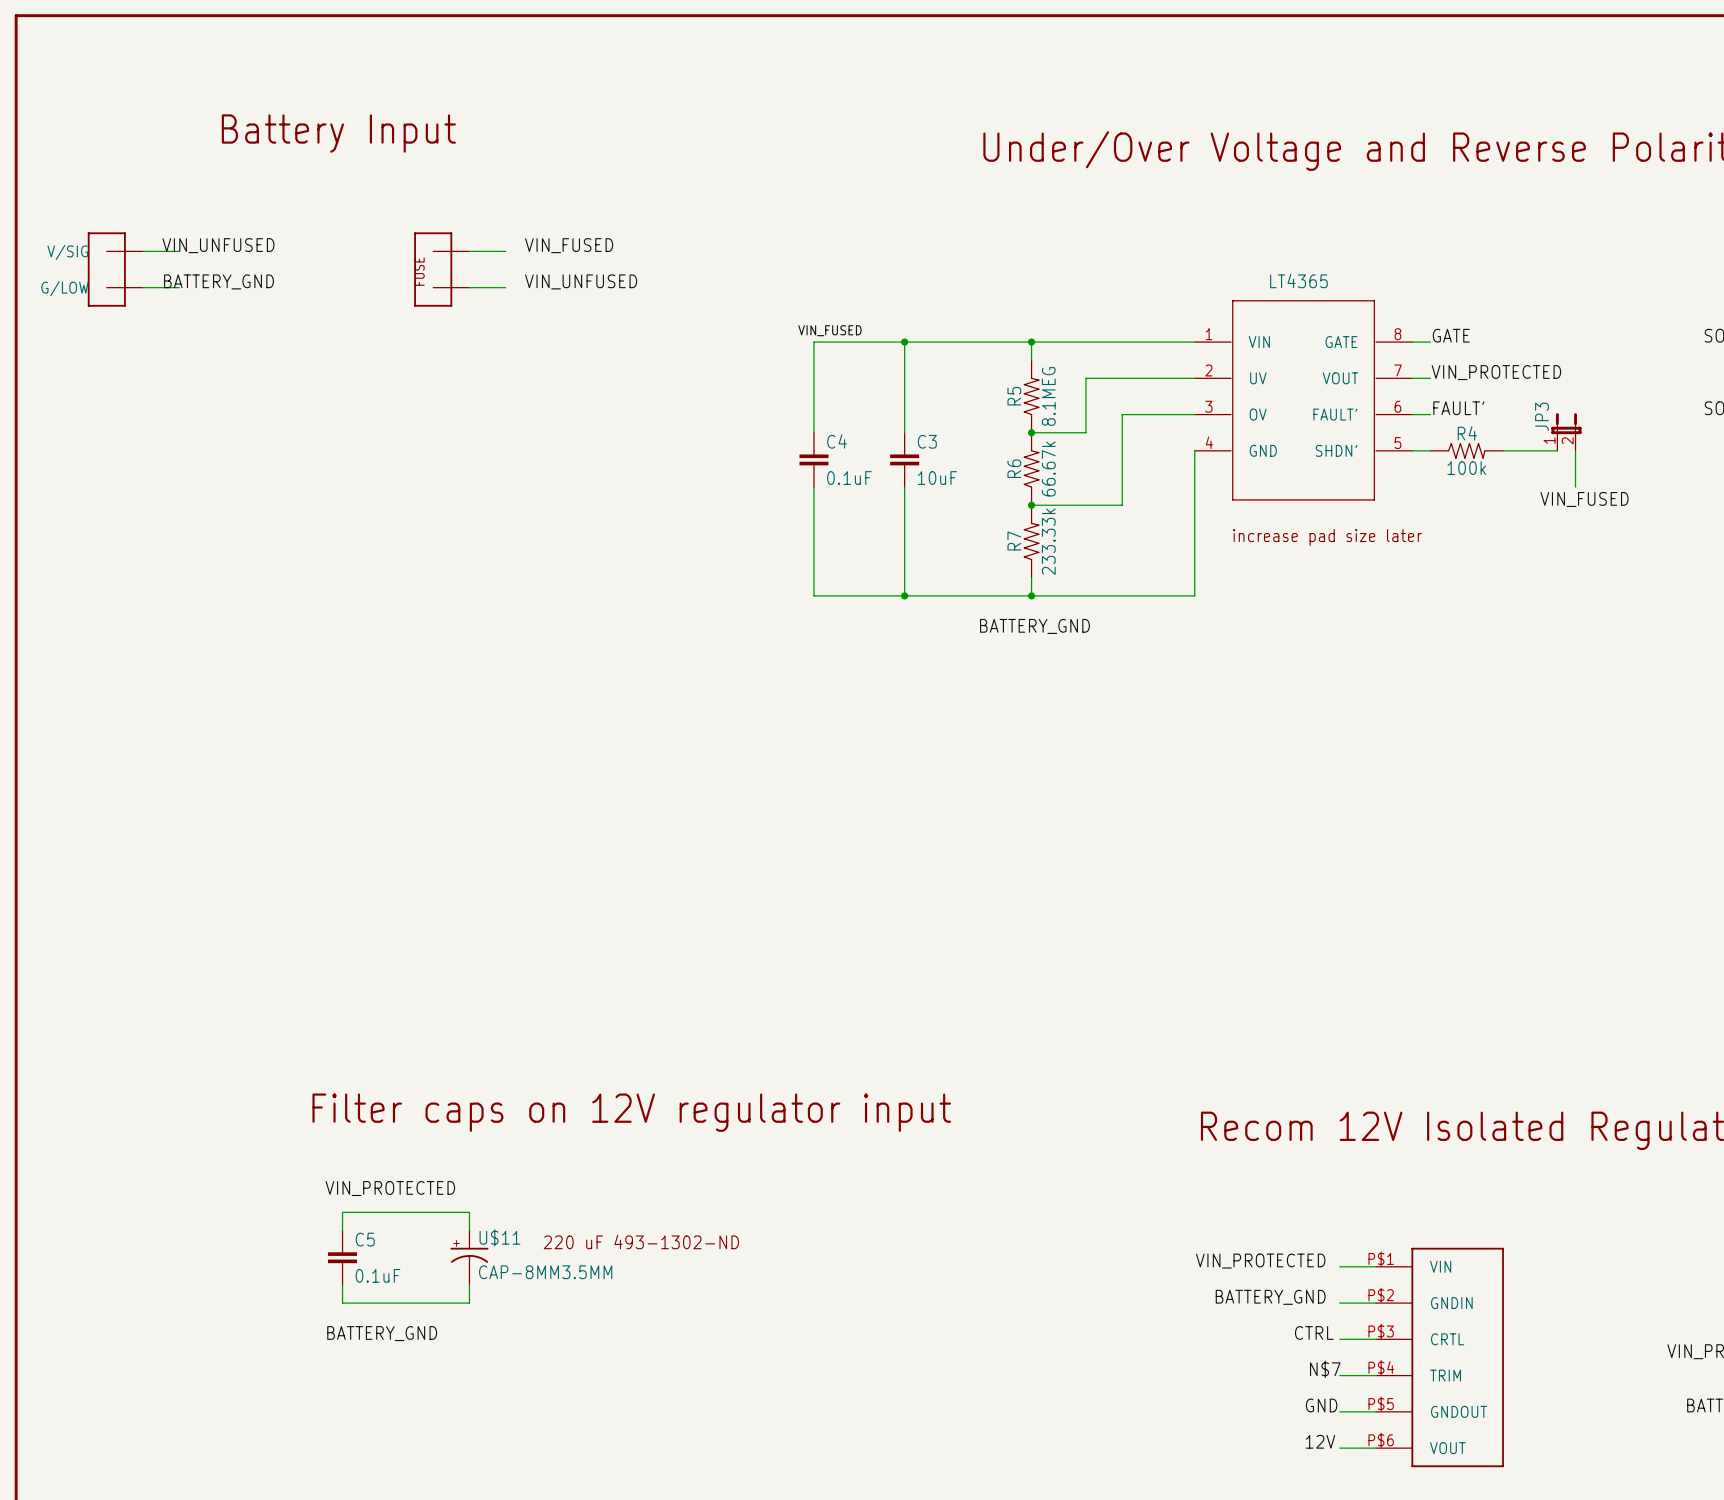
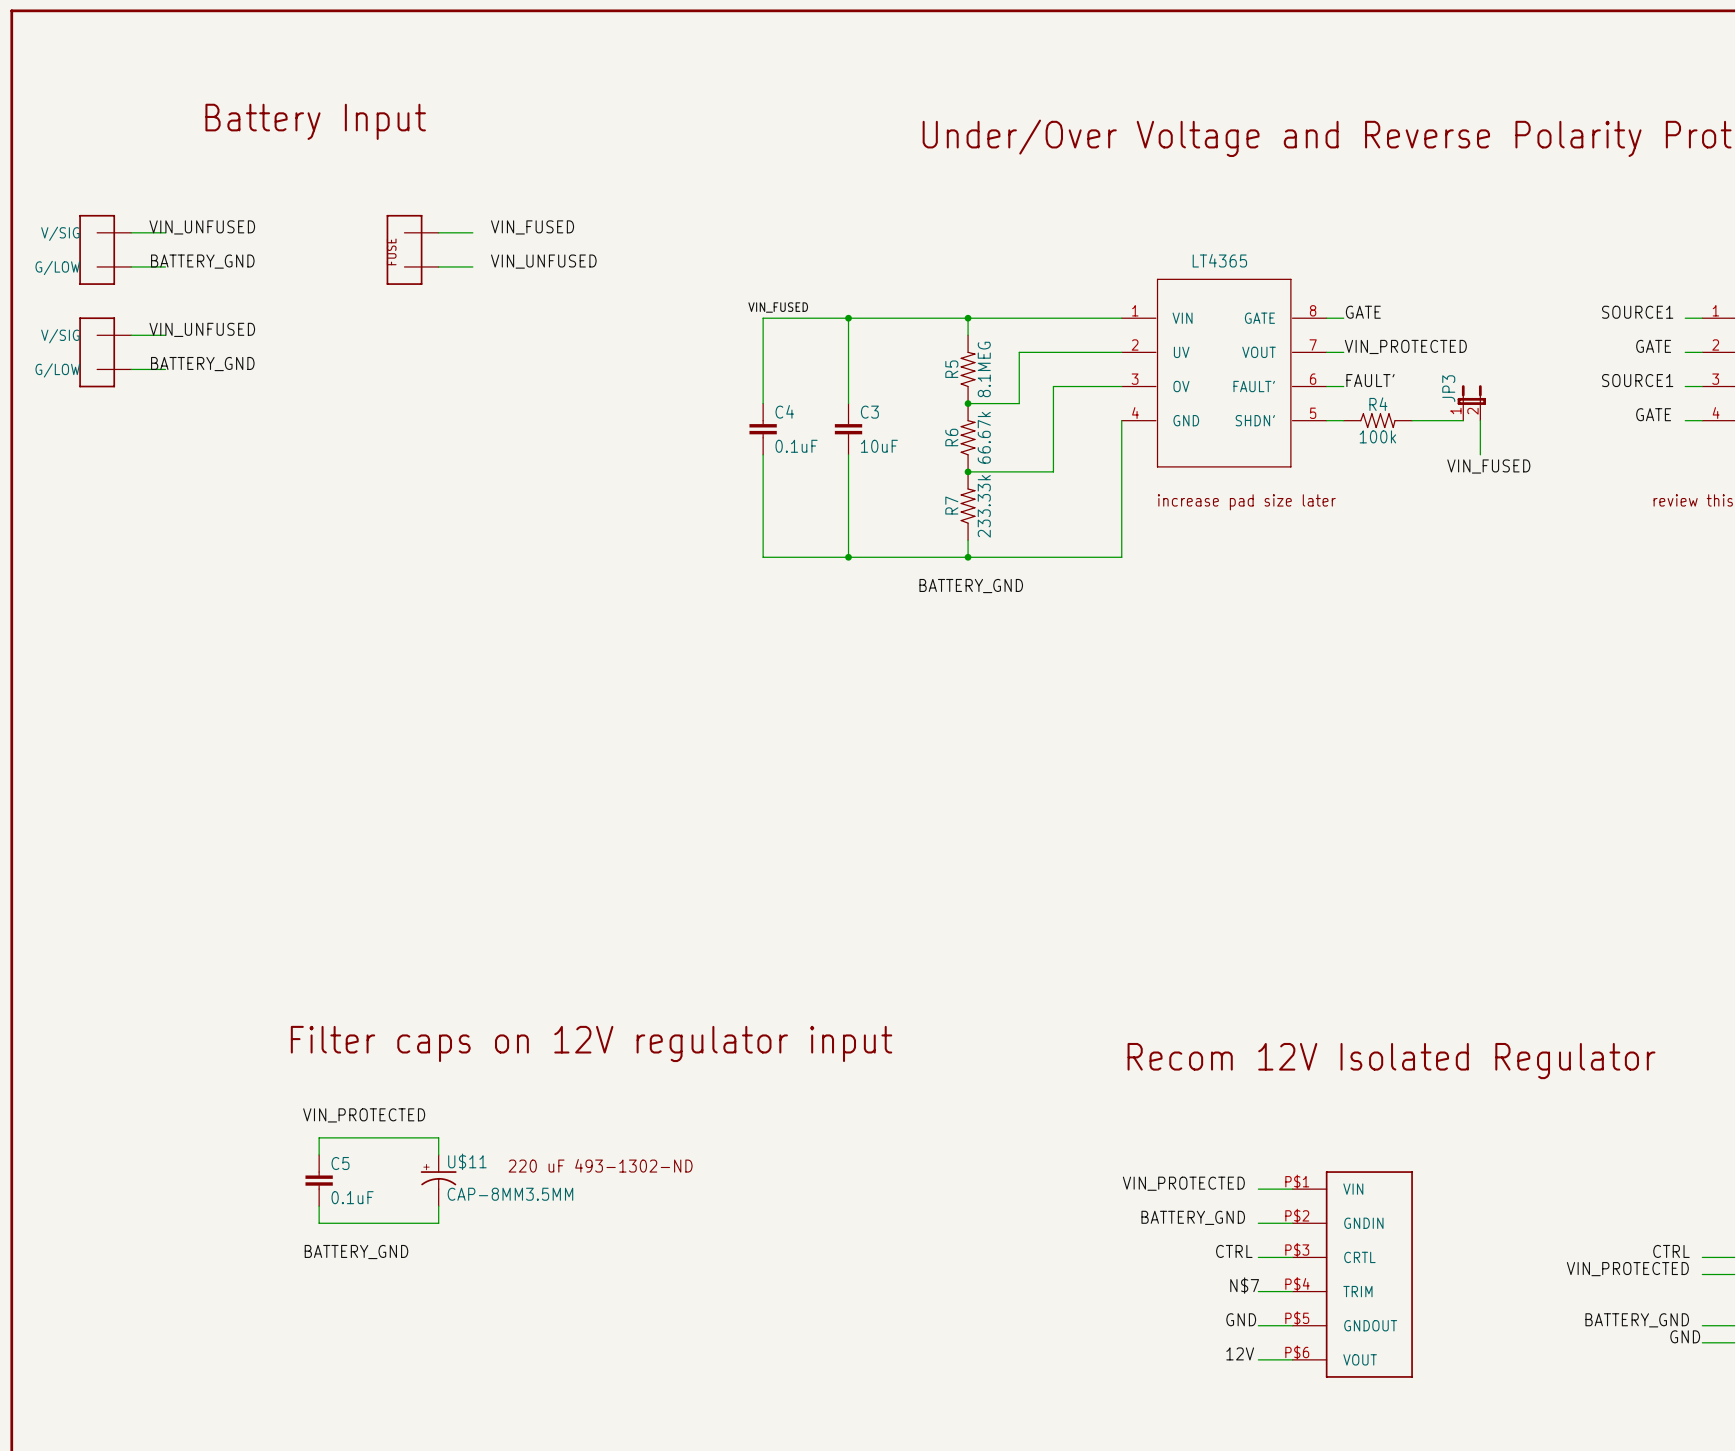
label: none -> VIN_UNFUSED (202, 329)
wire: none -> (131, 335) (165, 335)
part: none -> (105, 352)
label: none -> BATTERY_GND (202, 364)
wire: none -> (131, 369) (165, 369)

